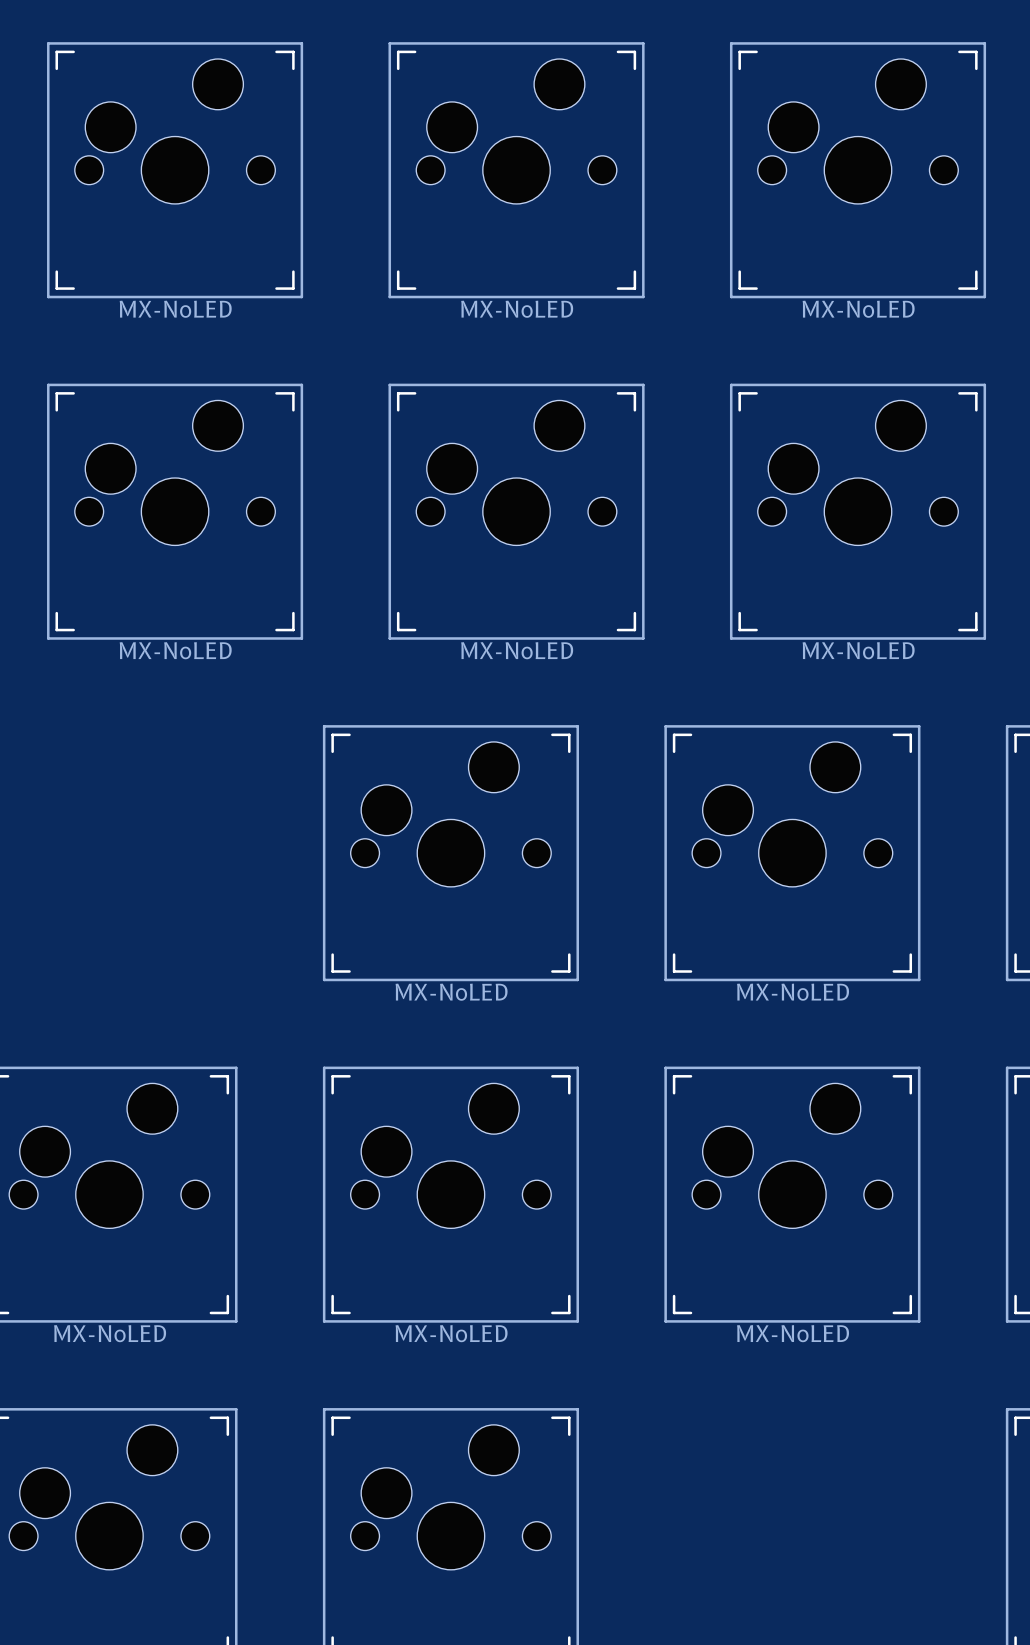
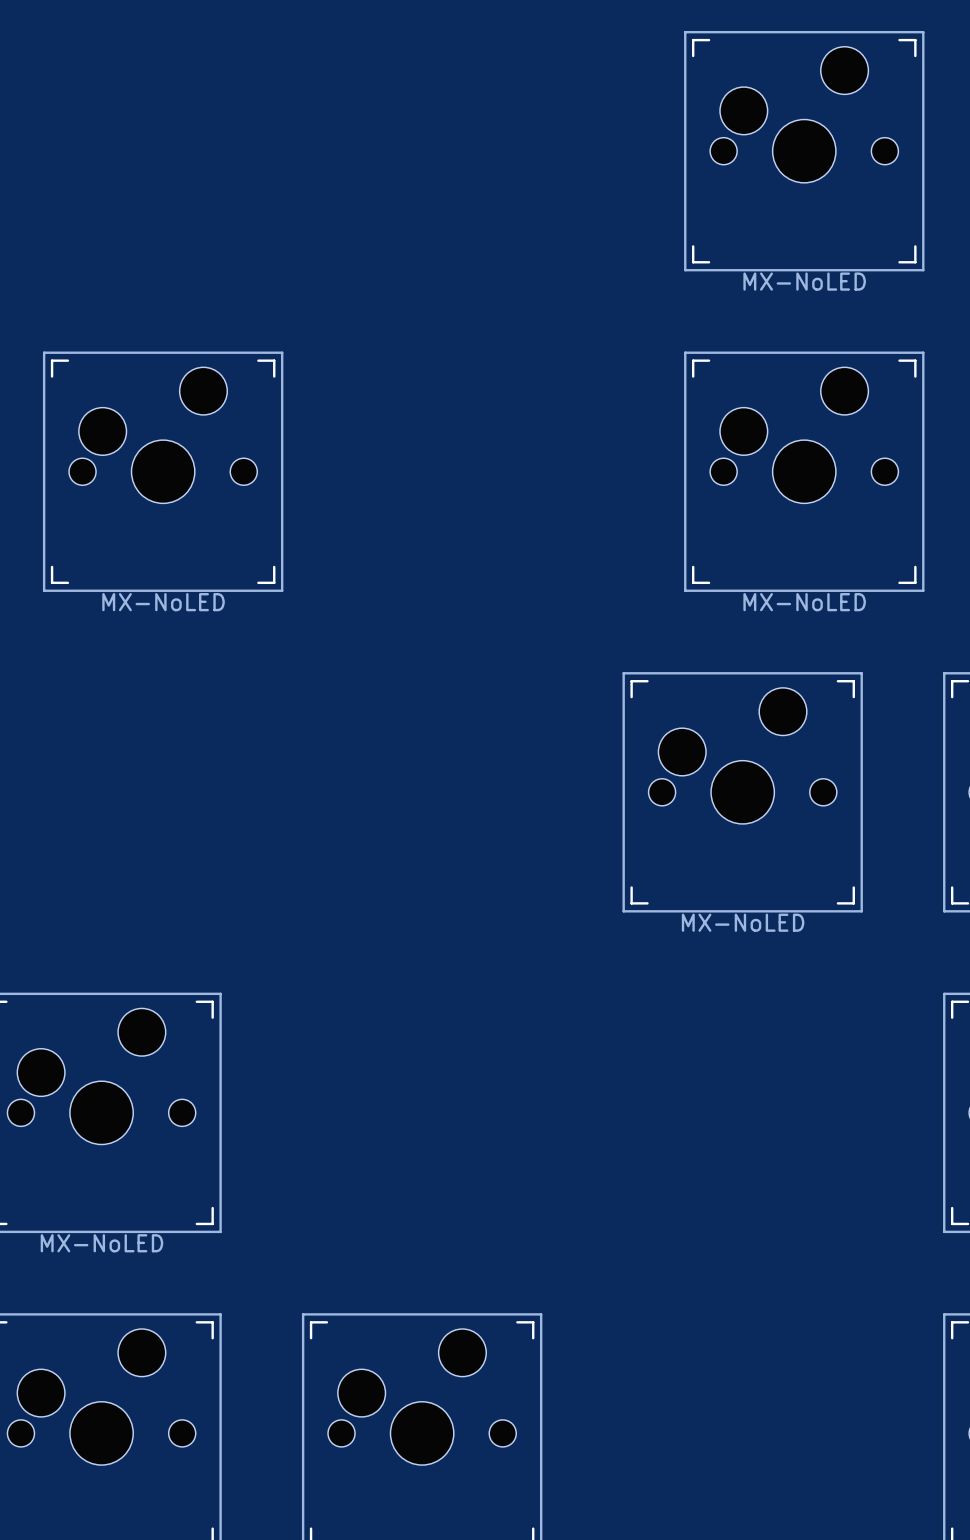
part: MX-NoLED (175, 170) -> none
part: MX-NoLED (516, 170) -> none
part: MX-NoLED (516, 511) -> none
part: MX-NoLED (450, 853) -> none
part: MX-NoLED (450, 1194) -> none
part: MX-NoLED (792, 1194) -> none

